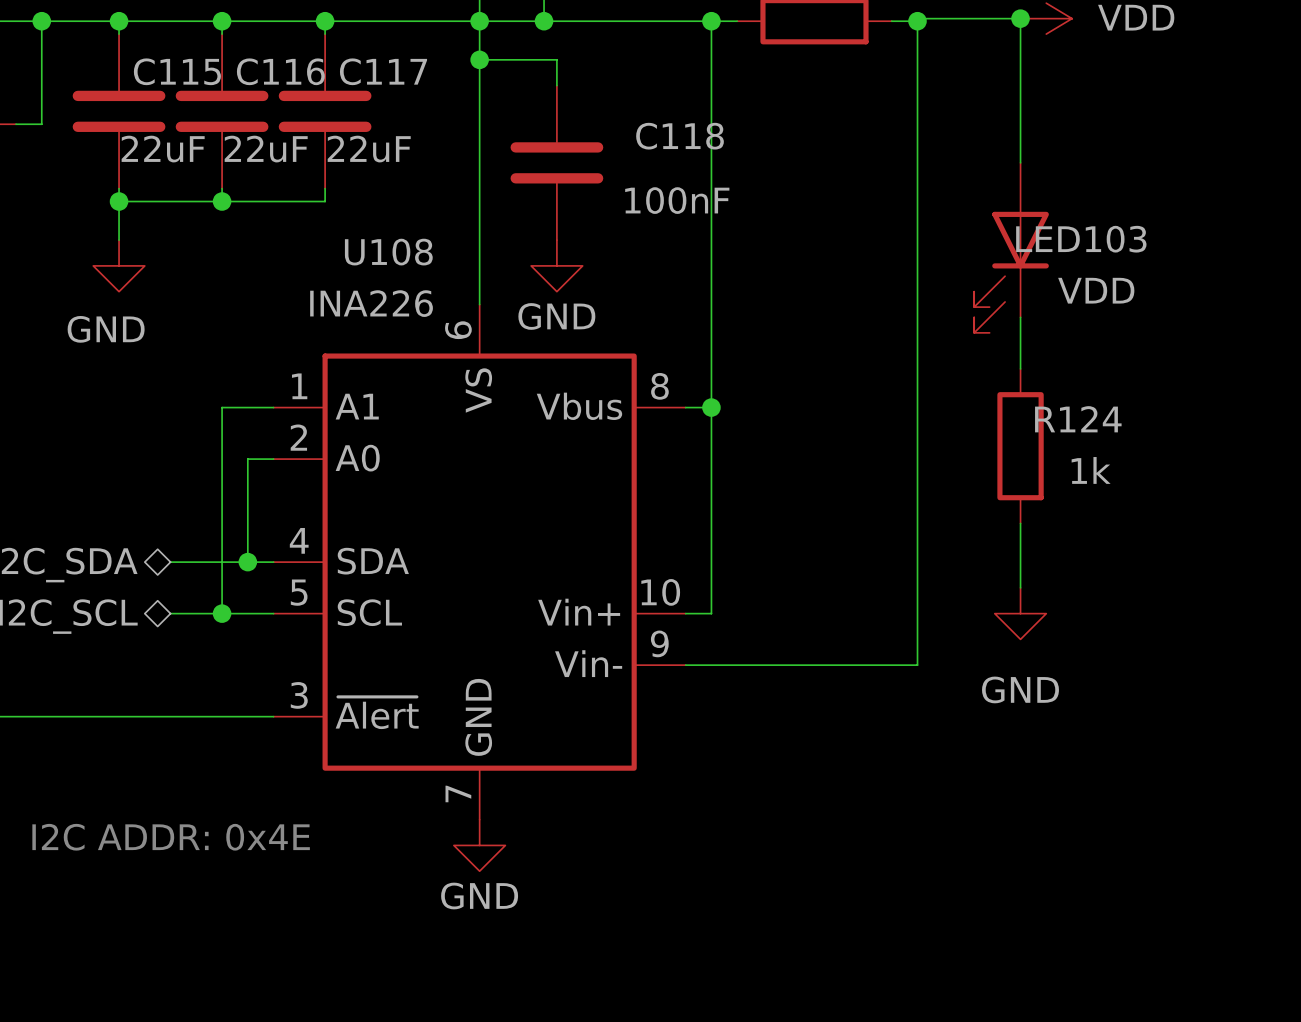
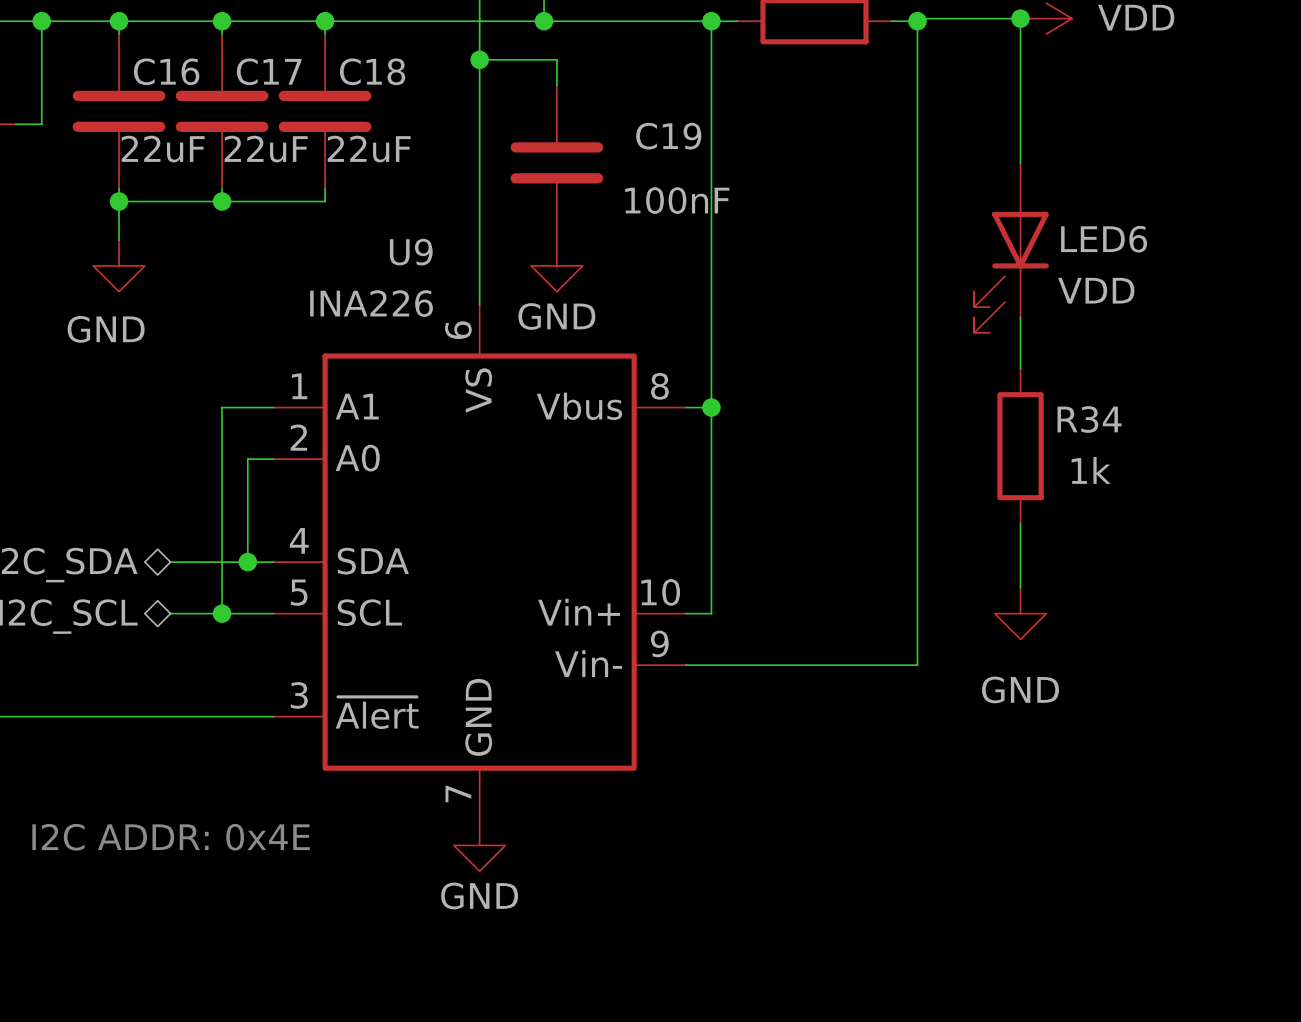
junction: (479, 21) -> none
C115 name: C115 (177, 71) -> C16 (166, 71)
C116 name: C116 (280, 71) -> C17 (269, 71)
C117 name: C117 (383, 71) -> C18 (372, 71)
C118 name: C118 (680, 136) -> C19 (668, 136)
LED103 name: LED103 (1081, 239) -> LED6 (1104, 239)
U108 name: U108 (388, 252) -> U9 (411, 252)
R124 name: R124 (1078, 419) -> R34 (1089, 419)

